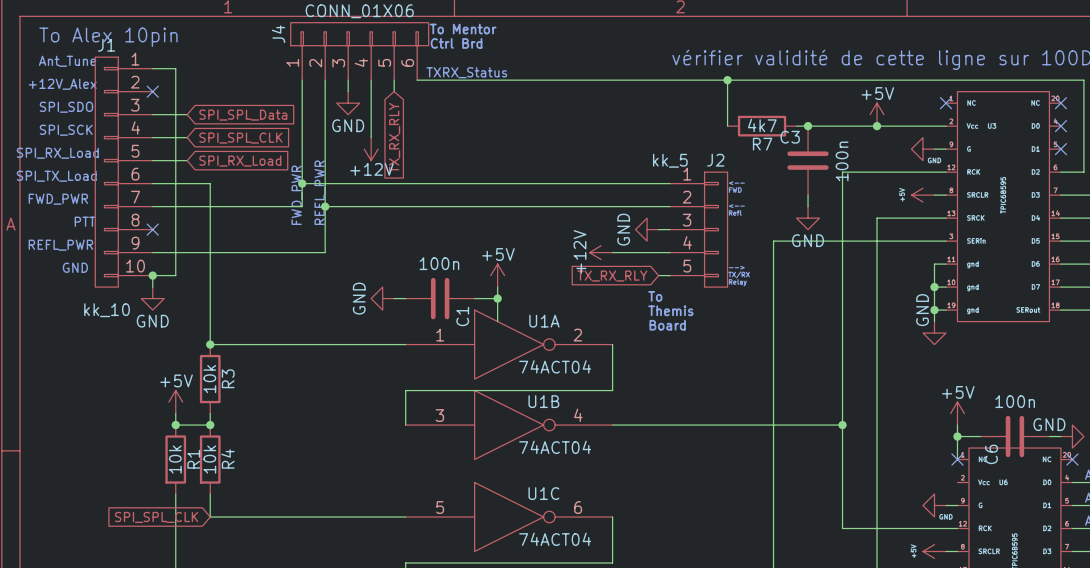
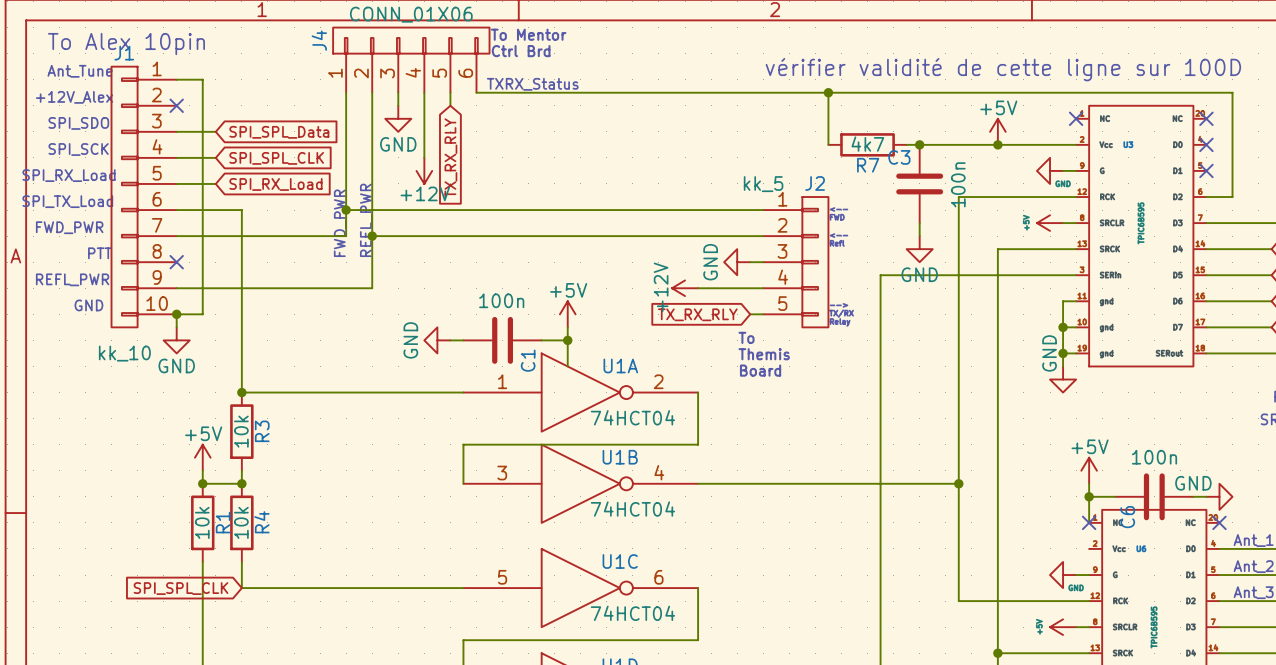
U1A value: 74ACT04 (555, 366) -> 74HCT04 (632, 417)
U1B value: 74ACT04 (555, 447) -> 74HCT04 (632, 509)
U1C value: 74ACT04 (555, 539) -> 74HCT04 (632, 613)

